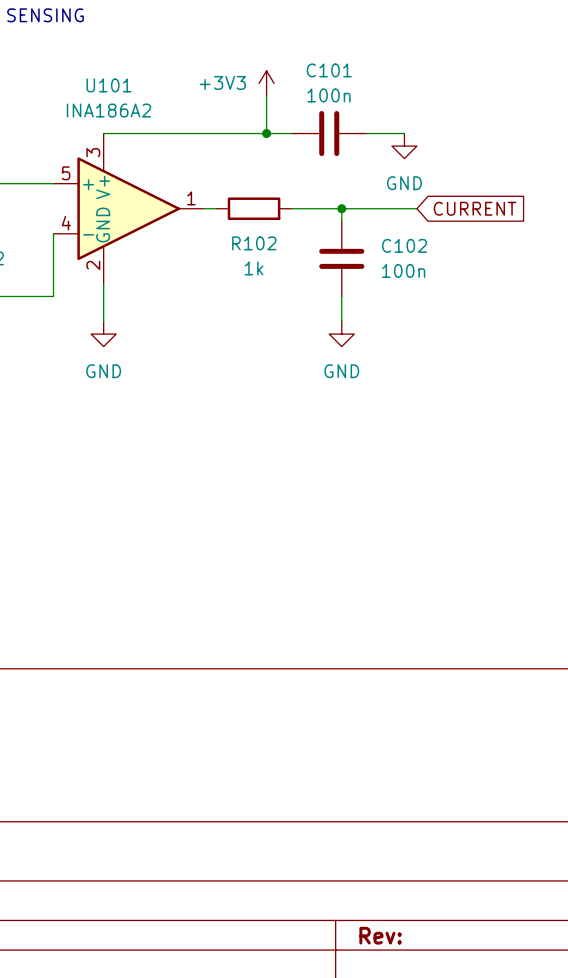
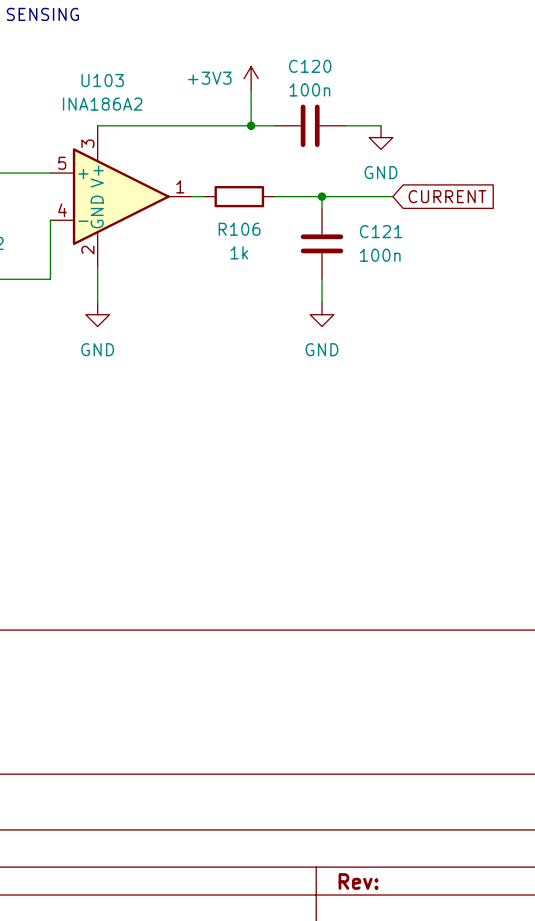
C101 name: C101 (329, 70) -> C120 (310, 66)
U101 name: U101 (108, 85) -> U103 (102, 80)
R102 name: R102 (254, 243) -> R106 (239, 229)
C102 name: C102 (404, 245) -> C121 (381, 231)

